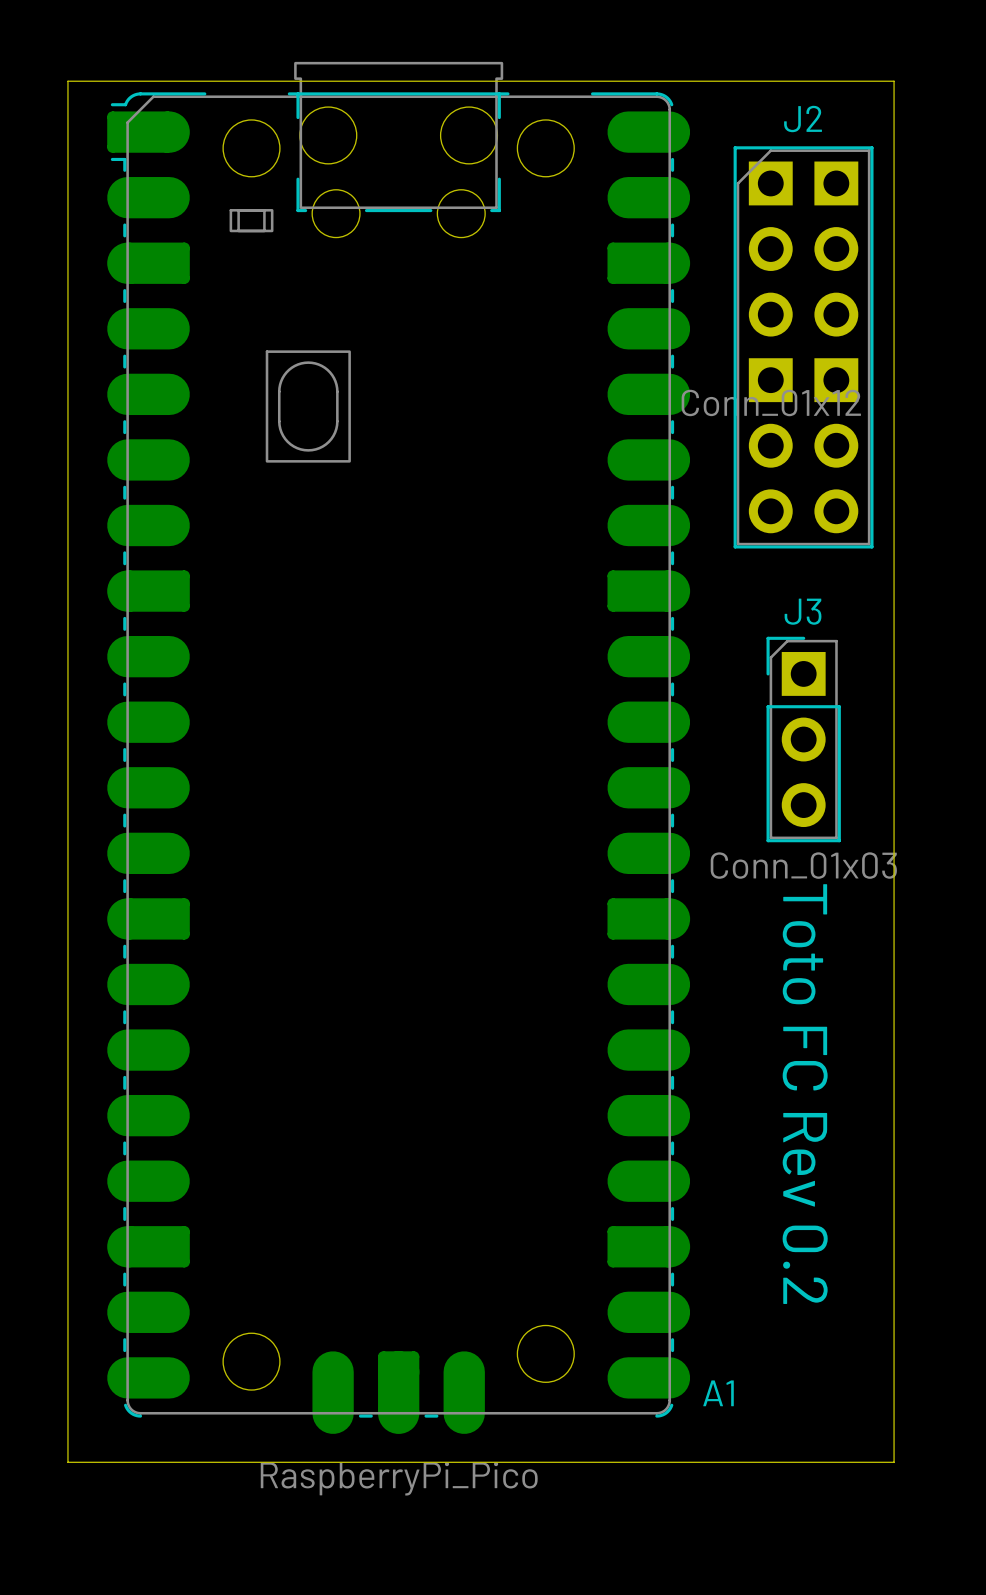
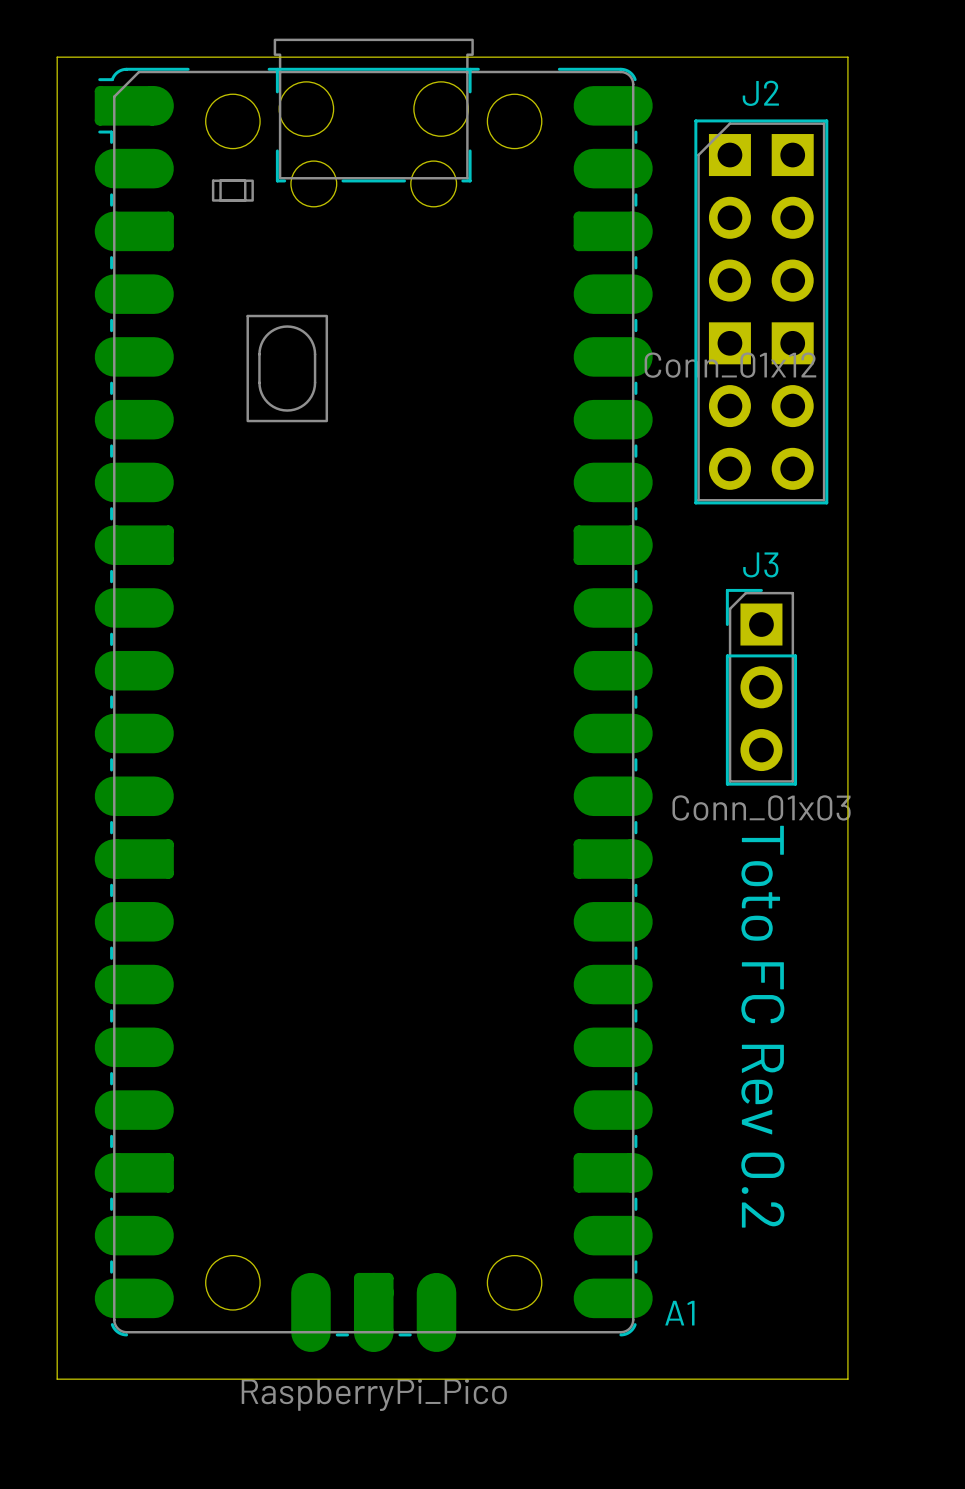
A1 footprint: [107, 61, 691, 1434] -> [94, 38, 653, 1353]

